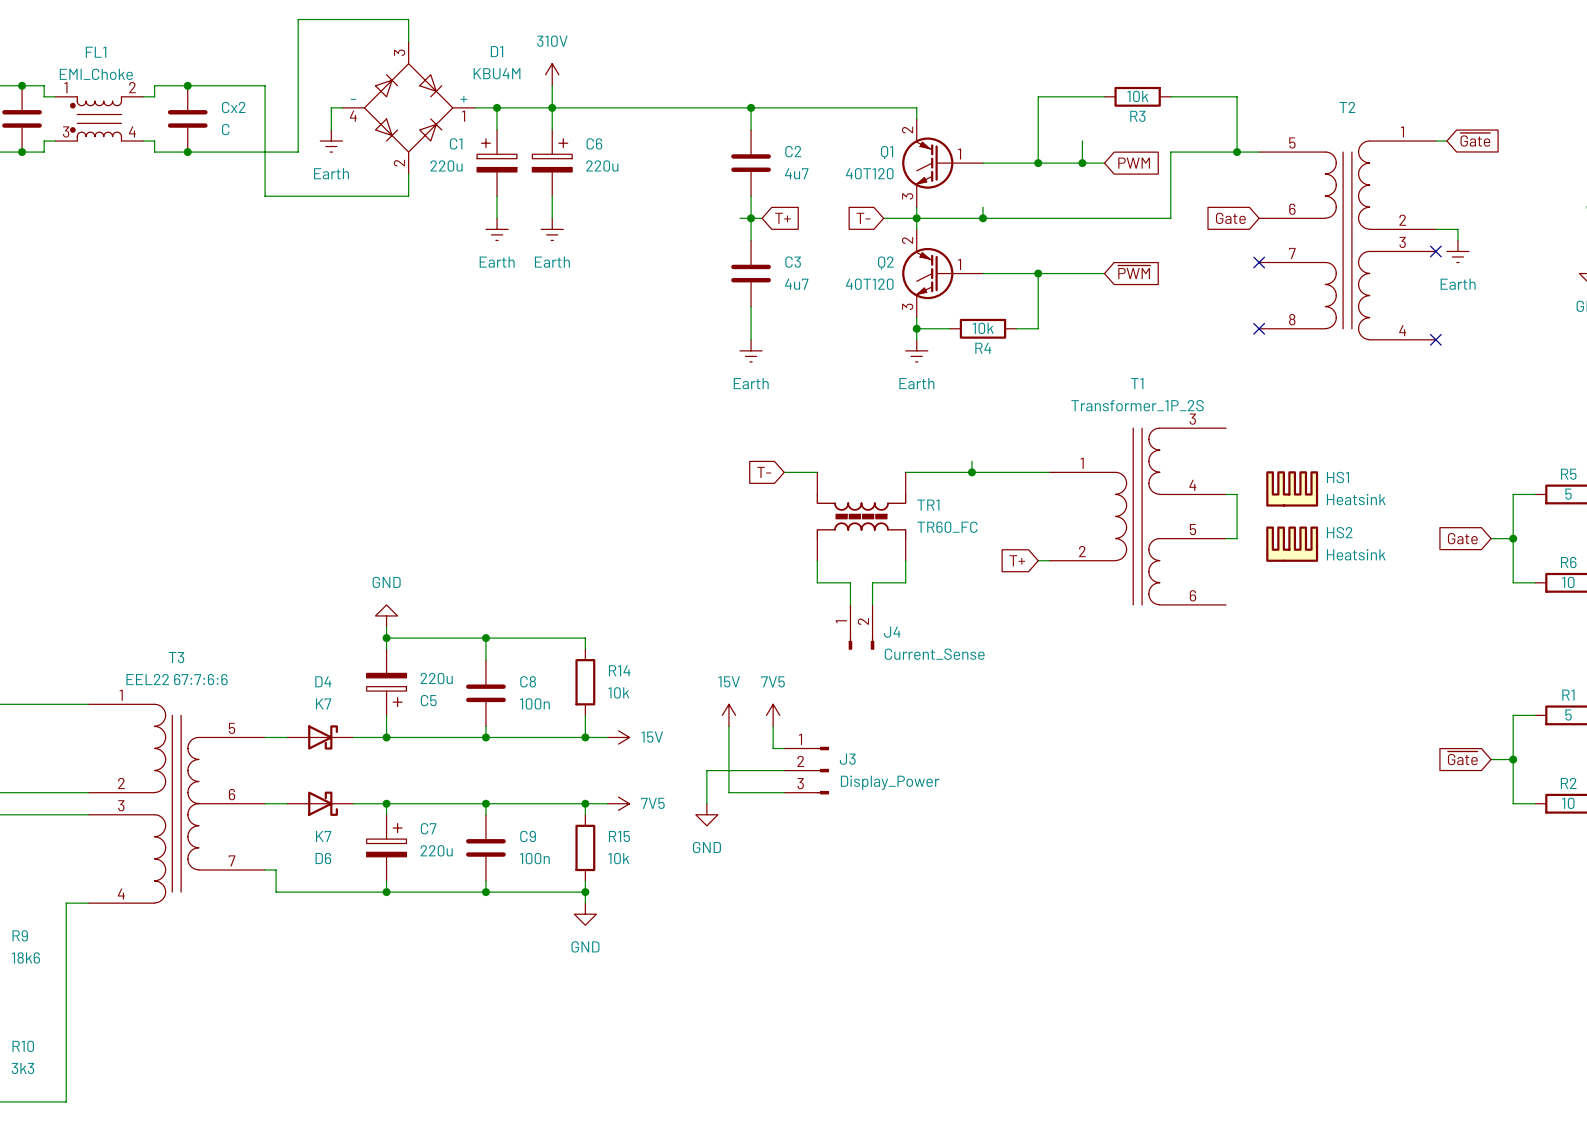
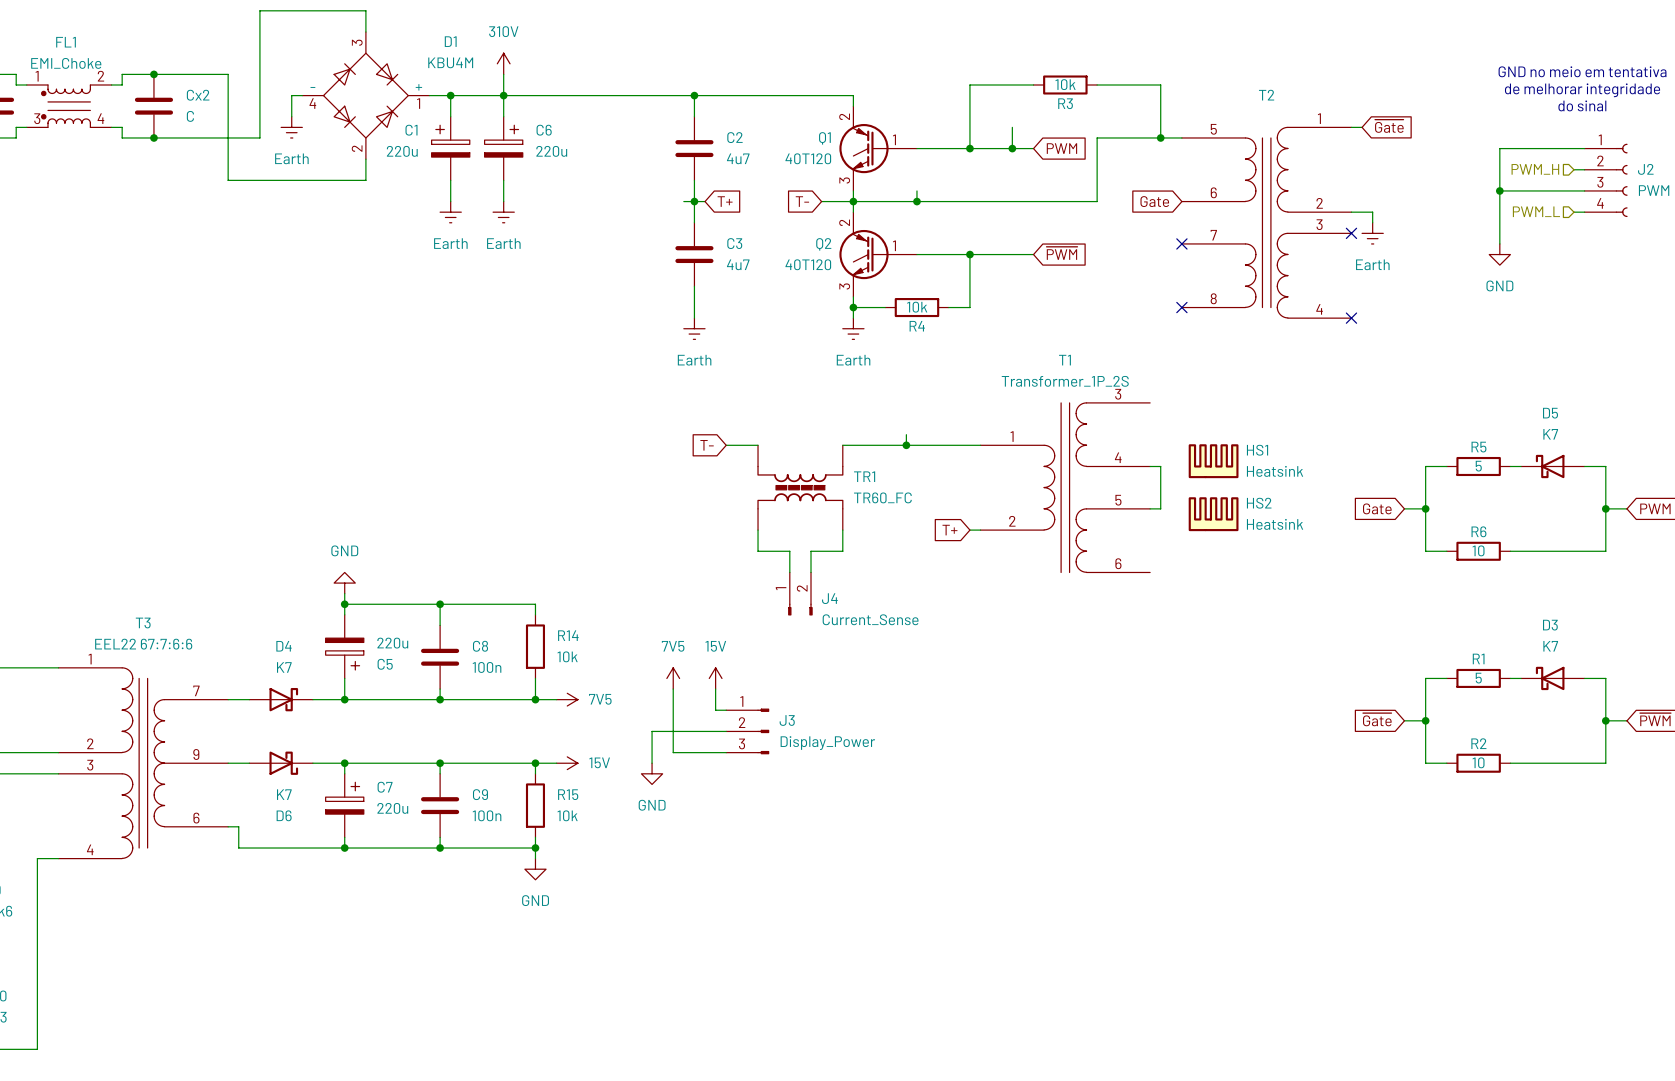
power symbol: 15V (728, 715) -> 7V5 (673, 678)
power symbol: 7V5 (773, 715) -> 15V (715, 678)
T3 pin number: 5 (232, 728) -> 7 (196, 690)
power symbol: 15V (618, 737) -> 7V5 (567, 699)
T3 pin number: 6 (232, 794) -> 9 (196, 754)
power symbol: 7V5 (618, 803) -> 15V (567, 763)
T3 pin number: 7 (232, 860) -> 6 (196, 818)

